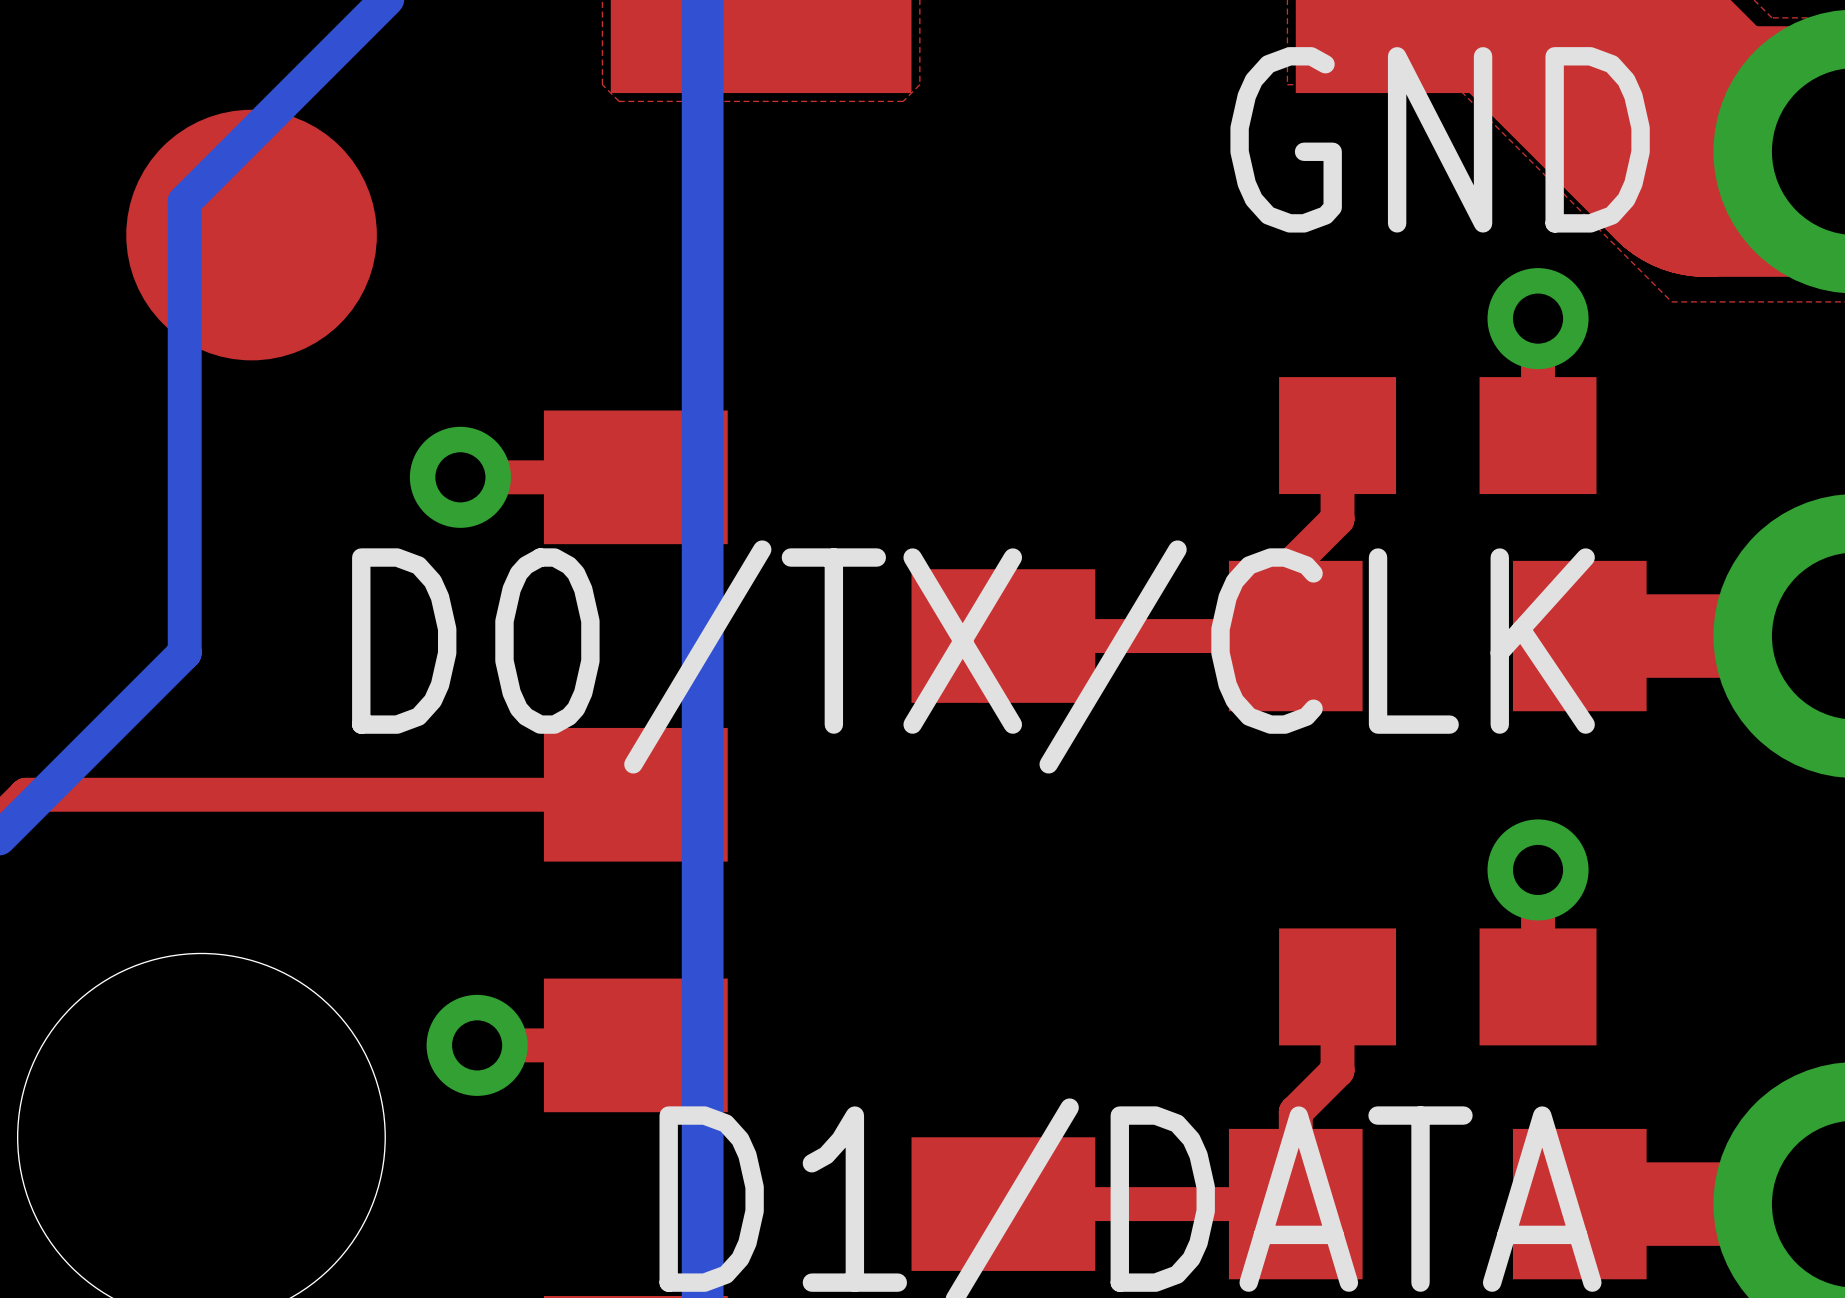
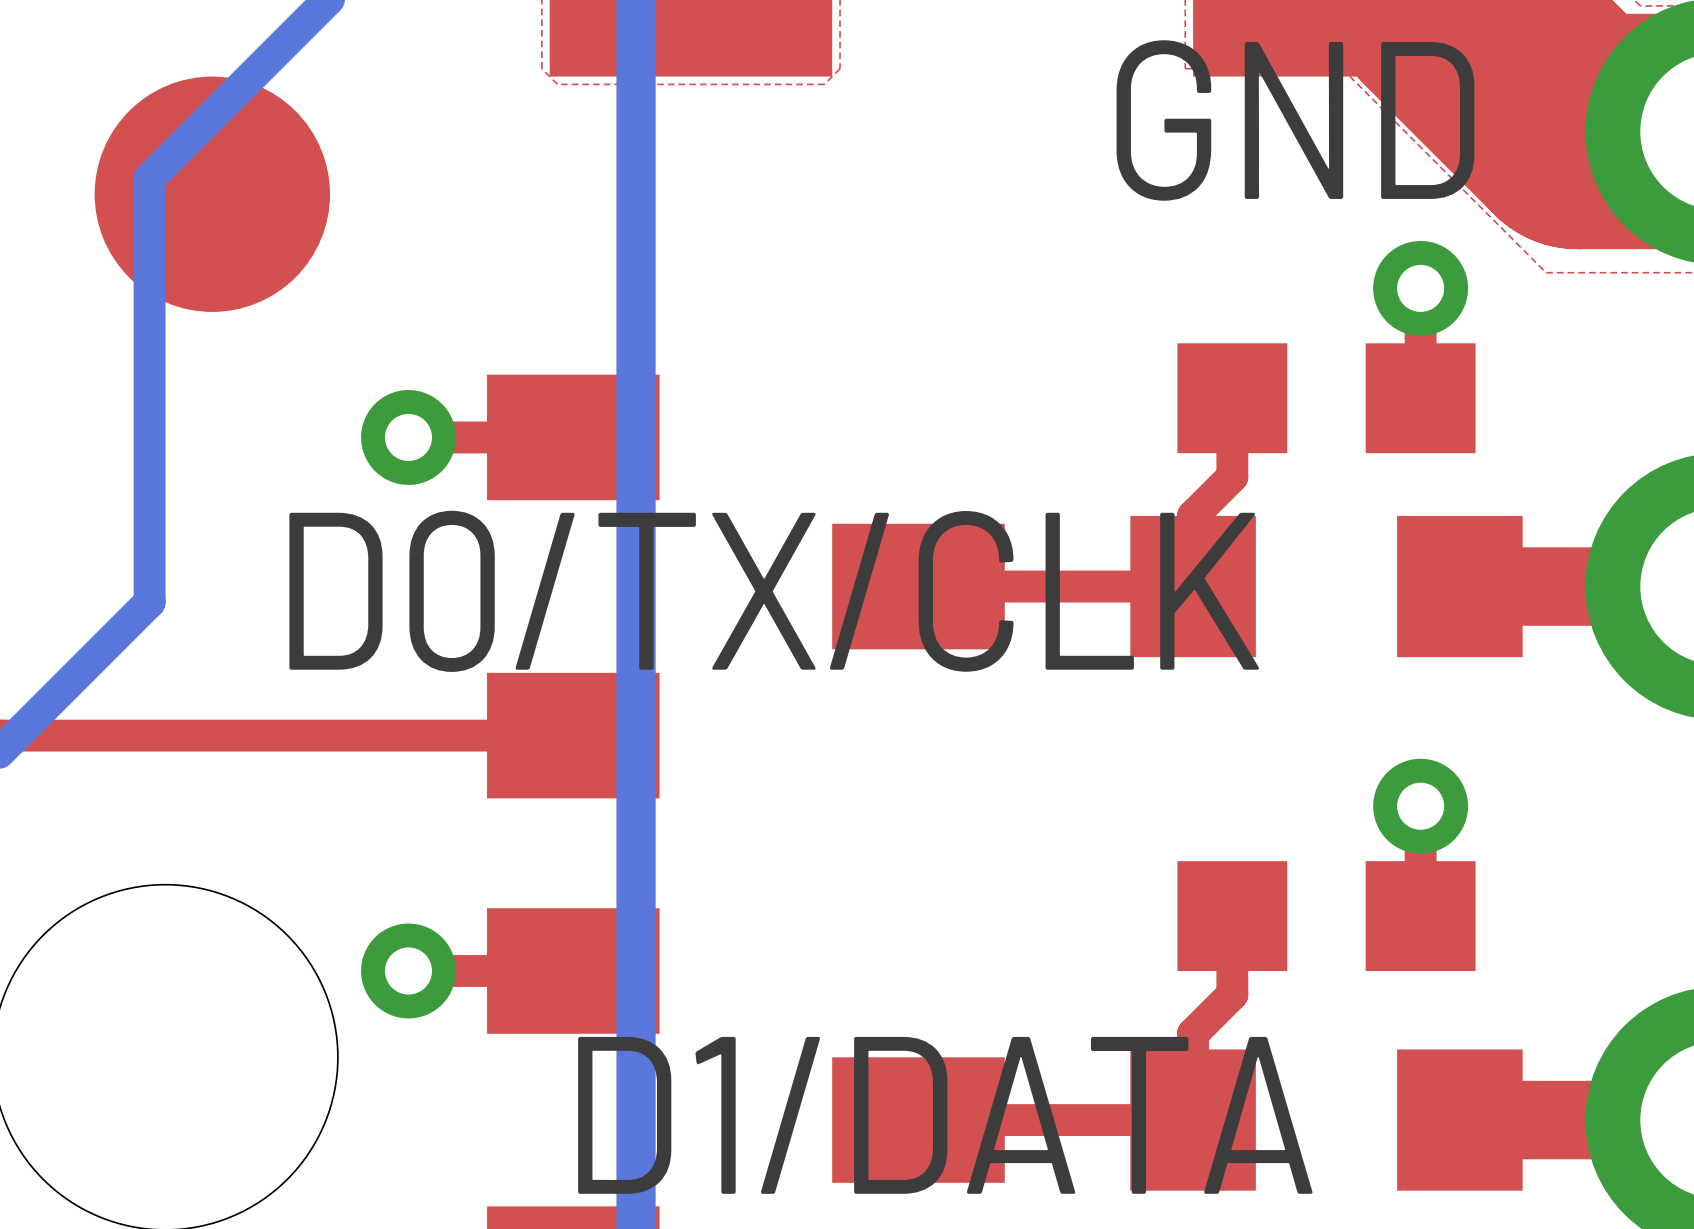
part position: (251, 235) -> (212, 194)
via position: (477, 1045) -> (408, 970)

